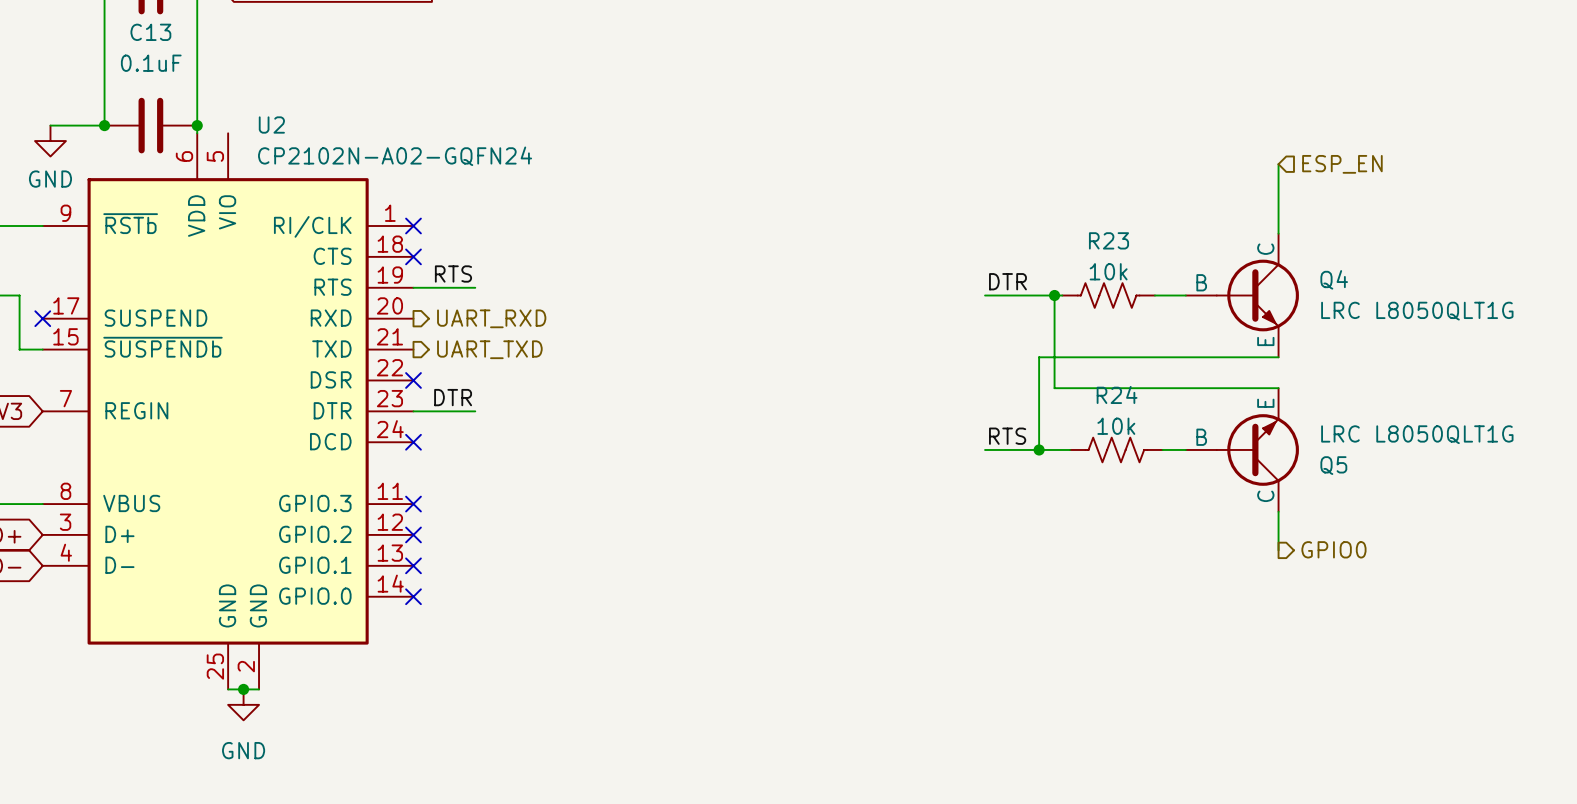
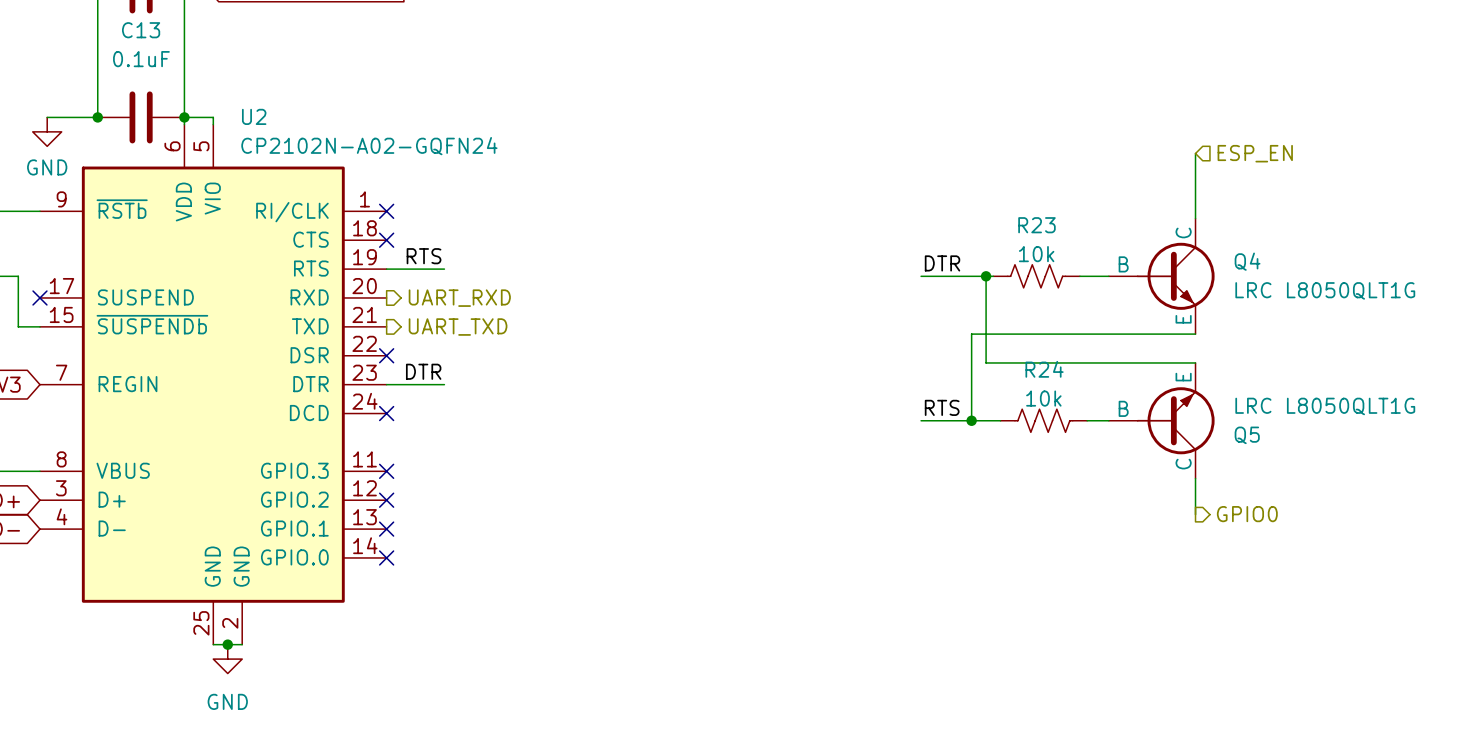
wire: none -> (184, 117) (213, 117) (213, 124)

